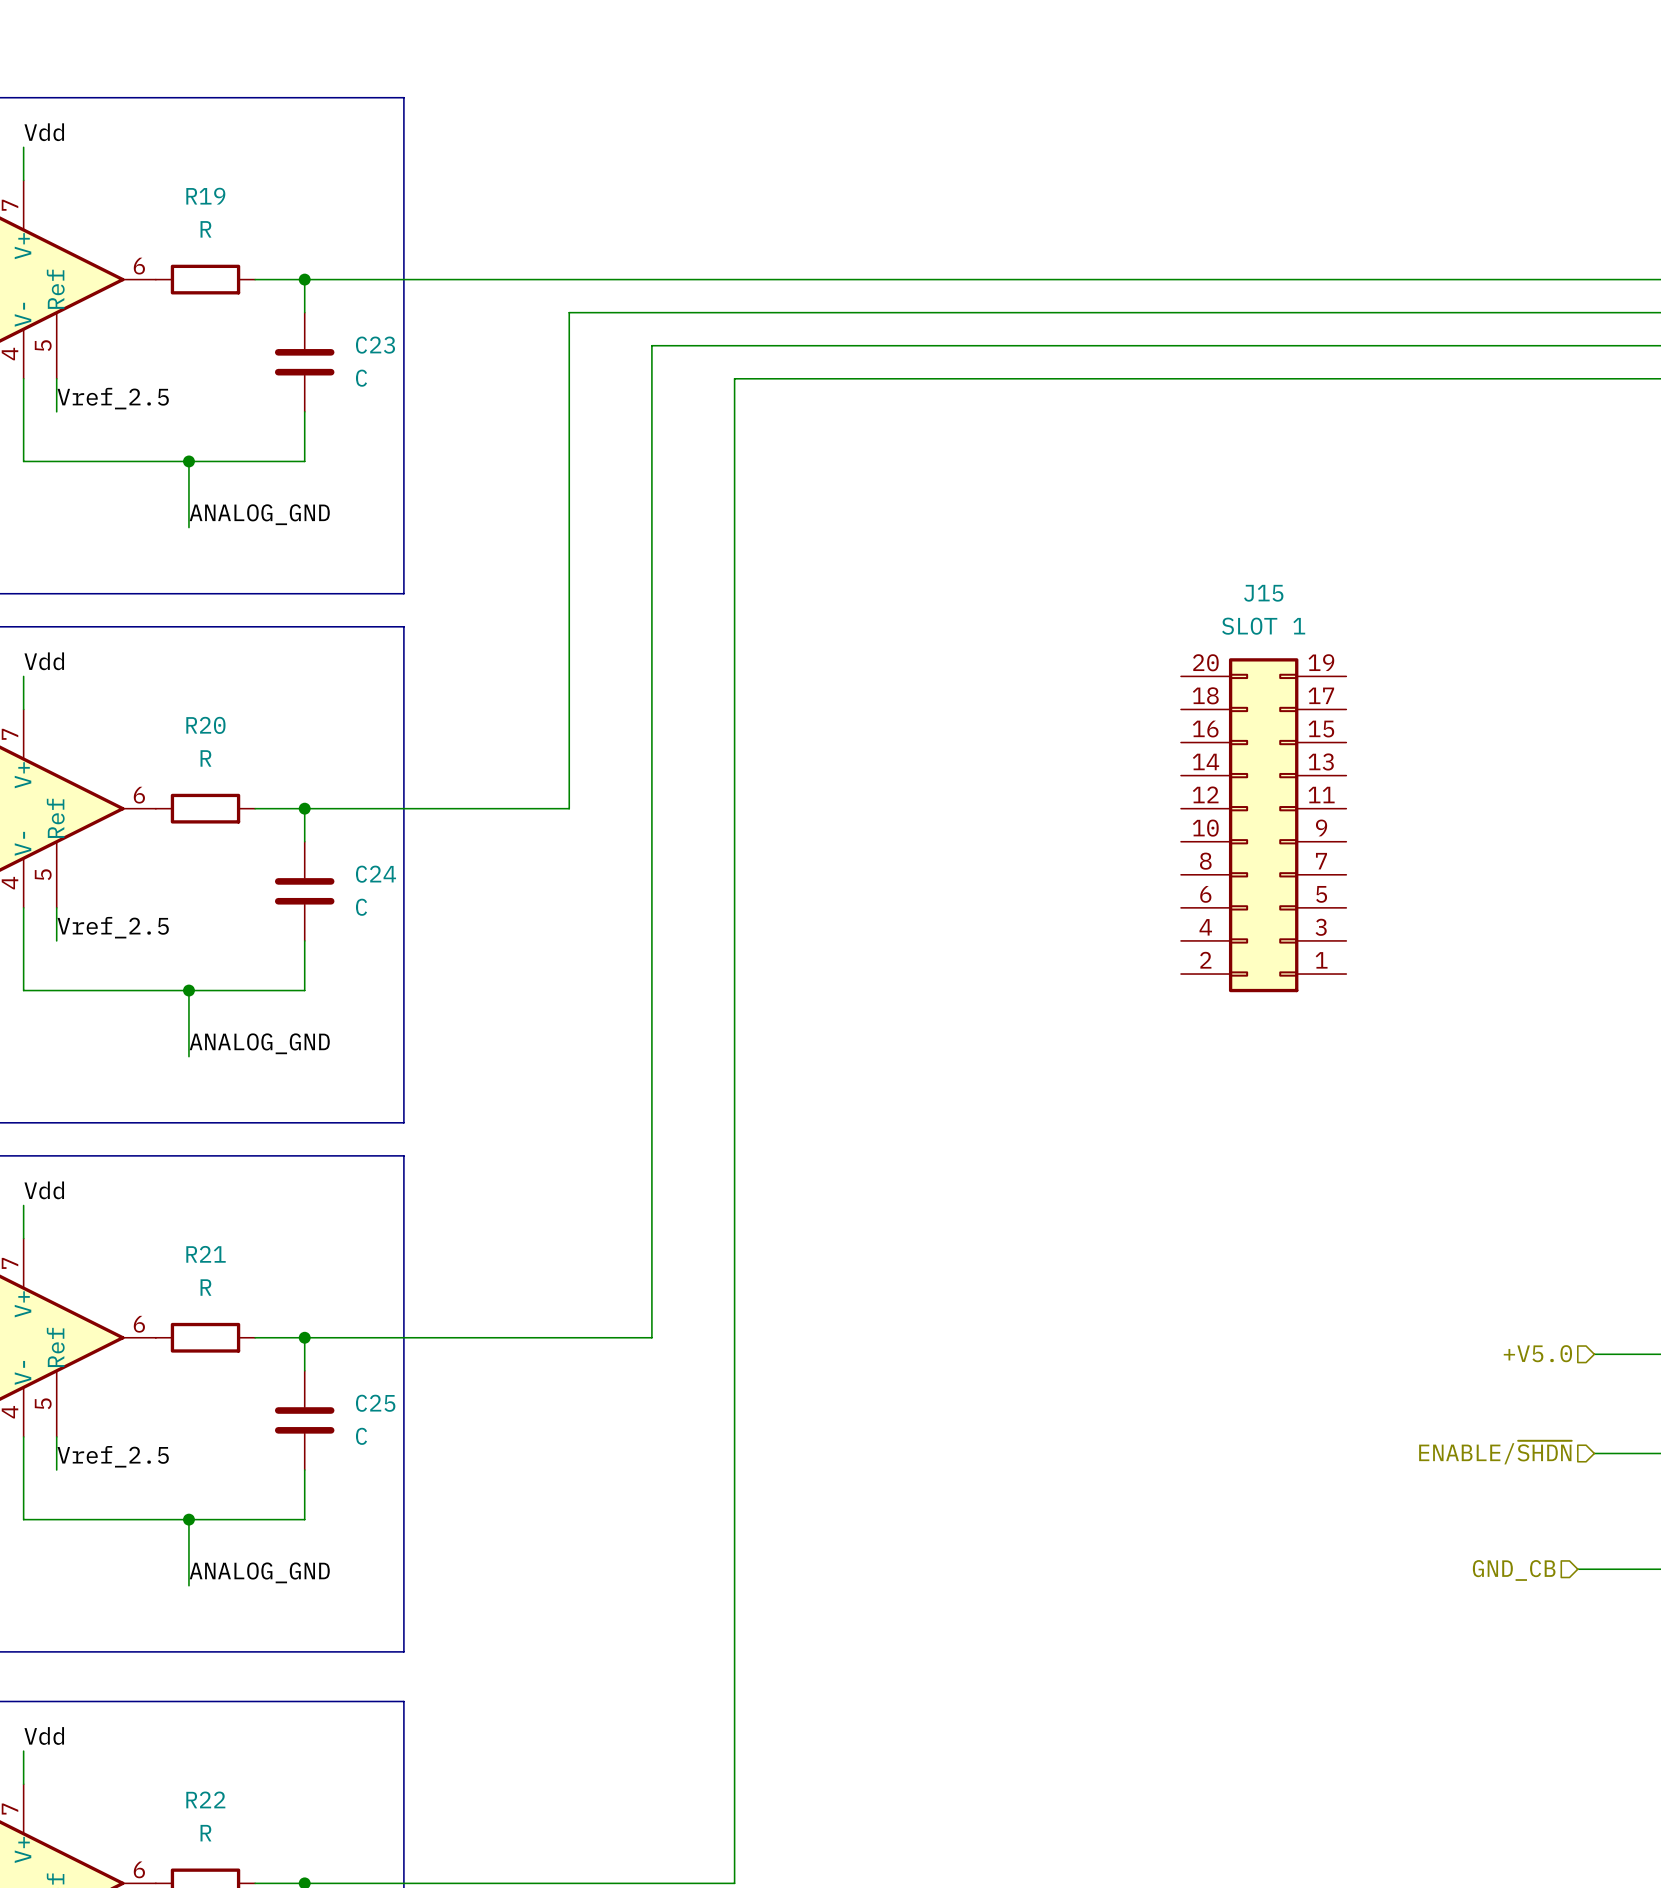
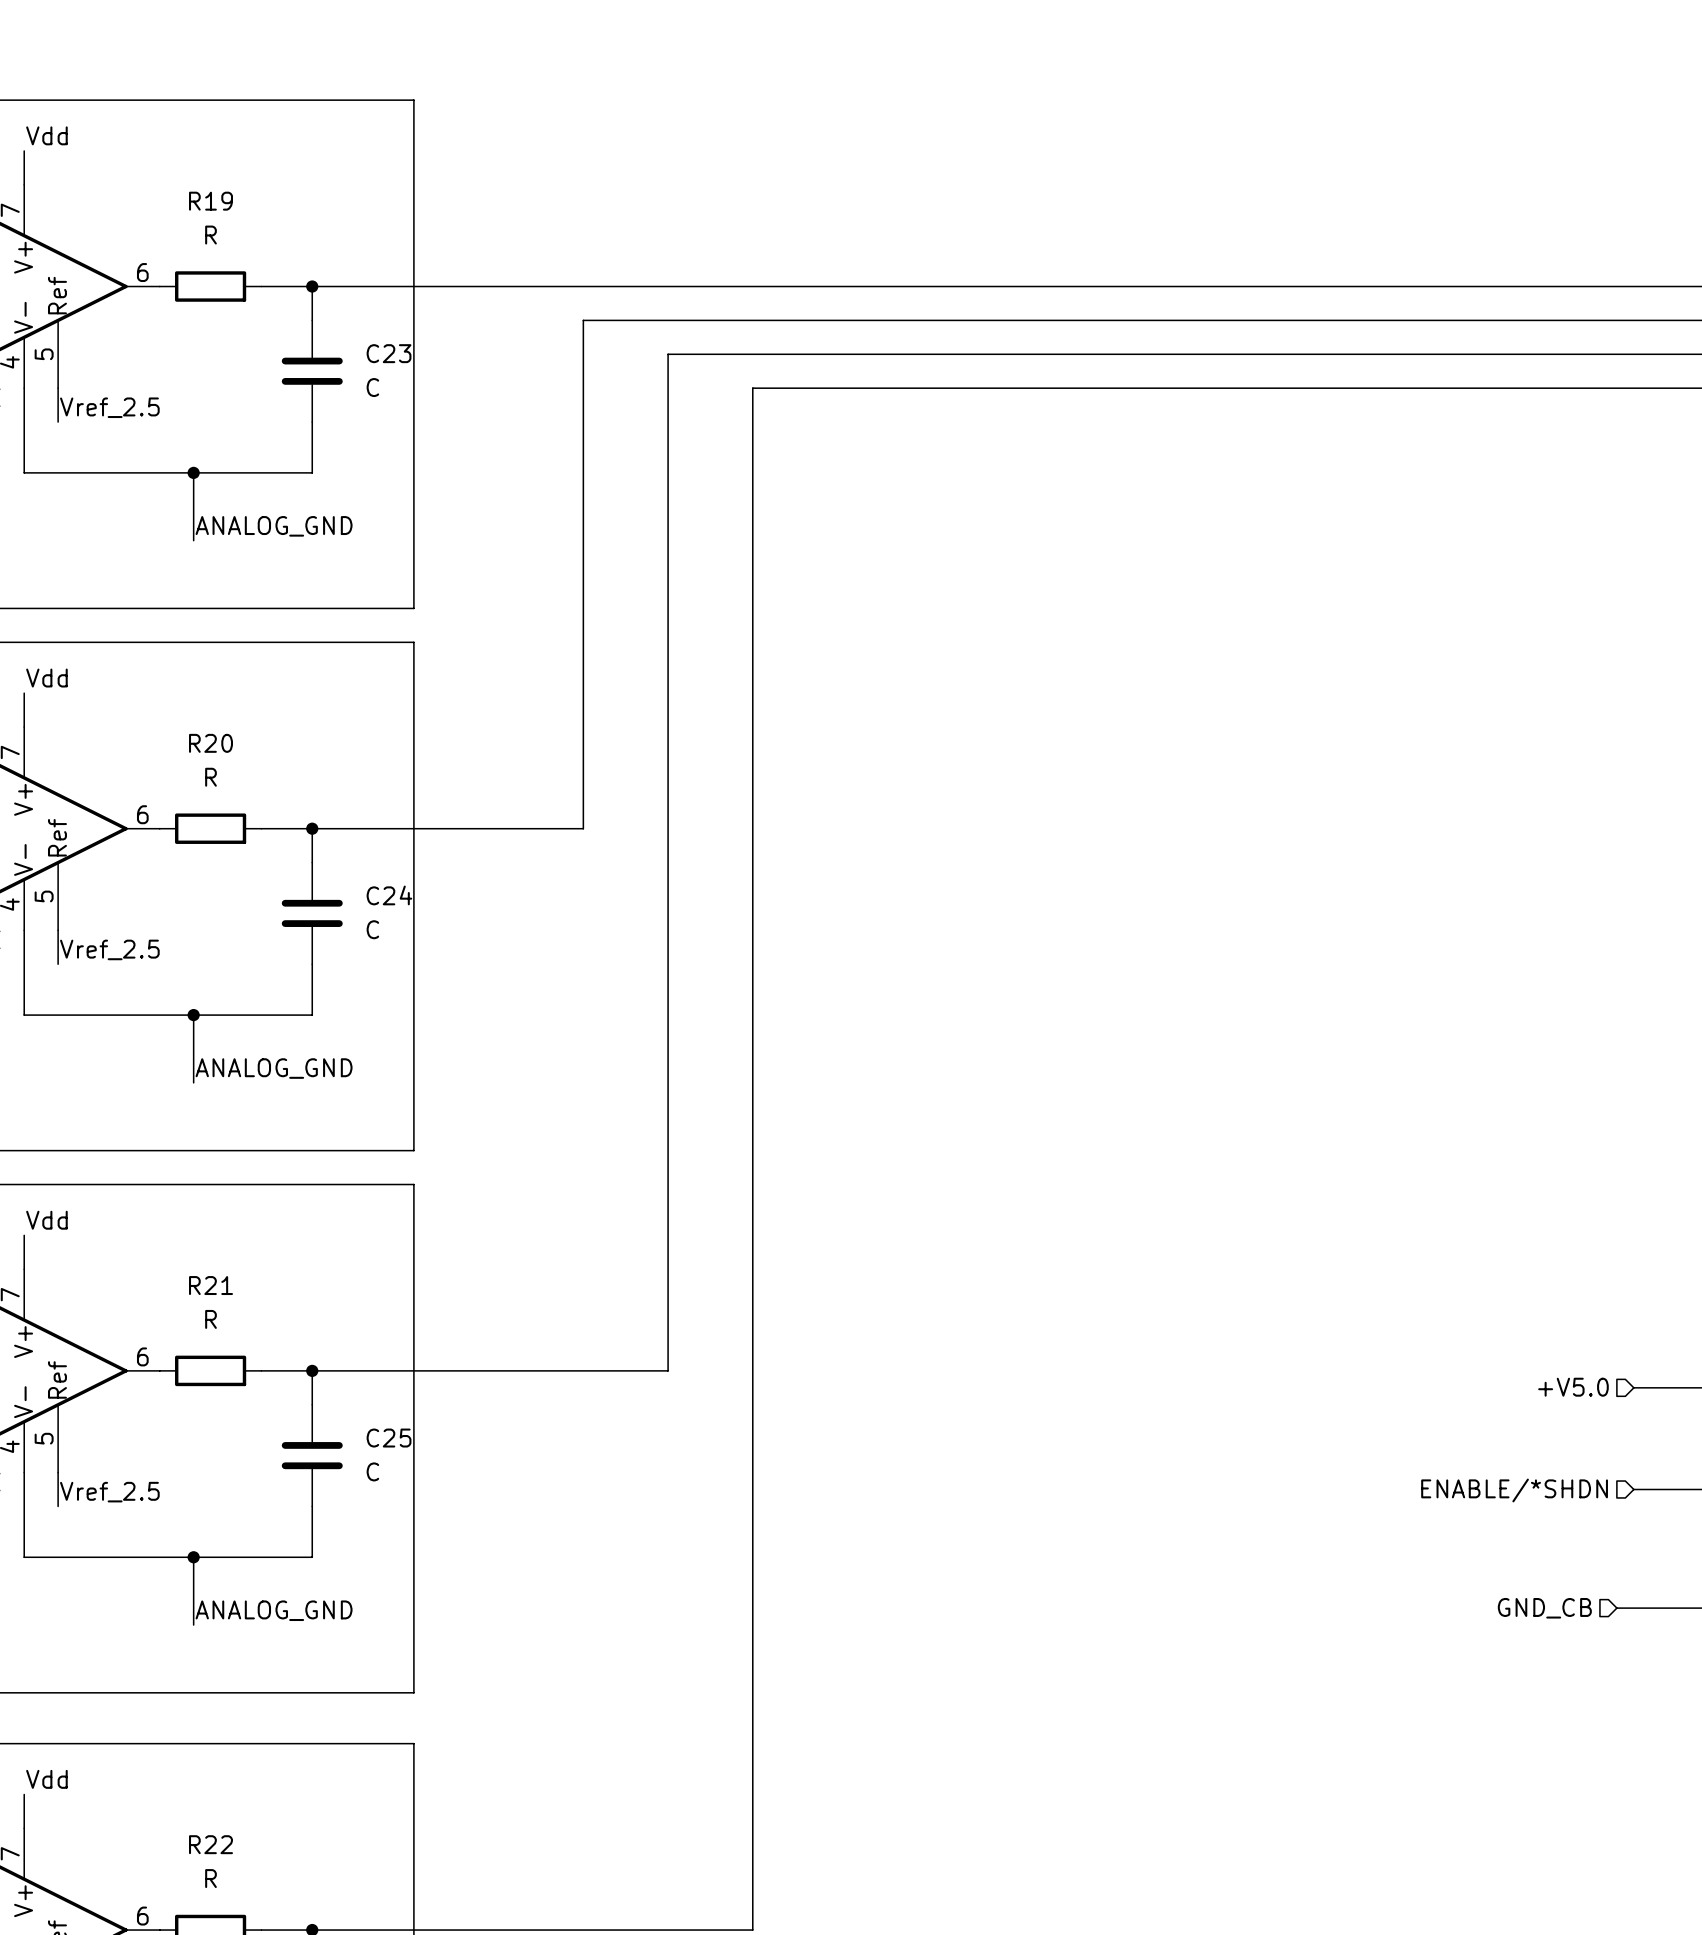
J15: SLOT 1 (1263, 825) -> none
hierarchical label: ENABLE/~{SHDN} (1495, 1452) -> ENABLE/*SHDN (1514, 1490)

